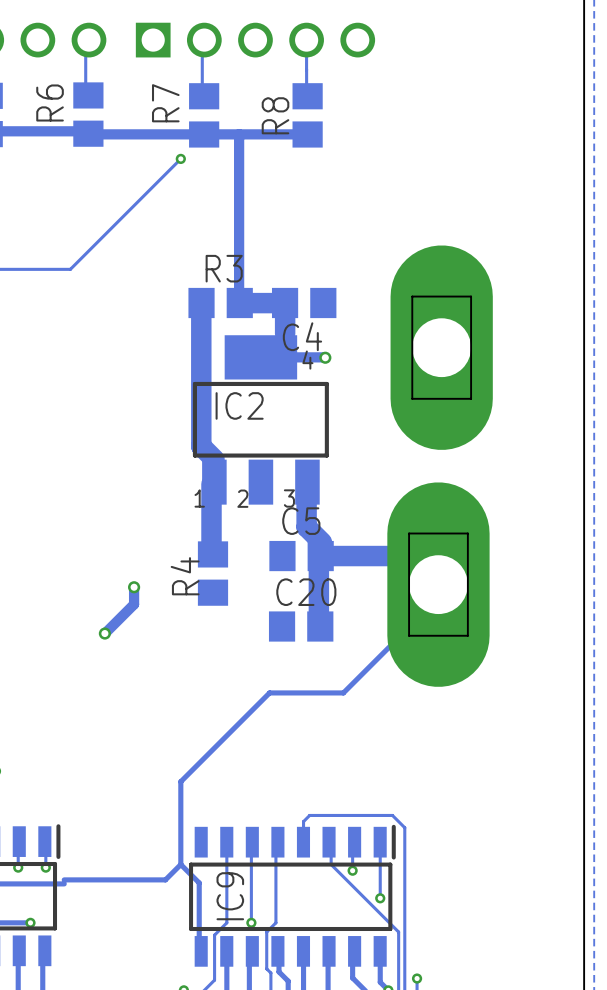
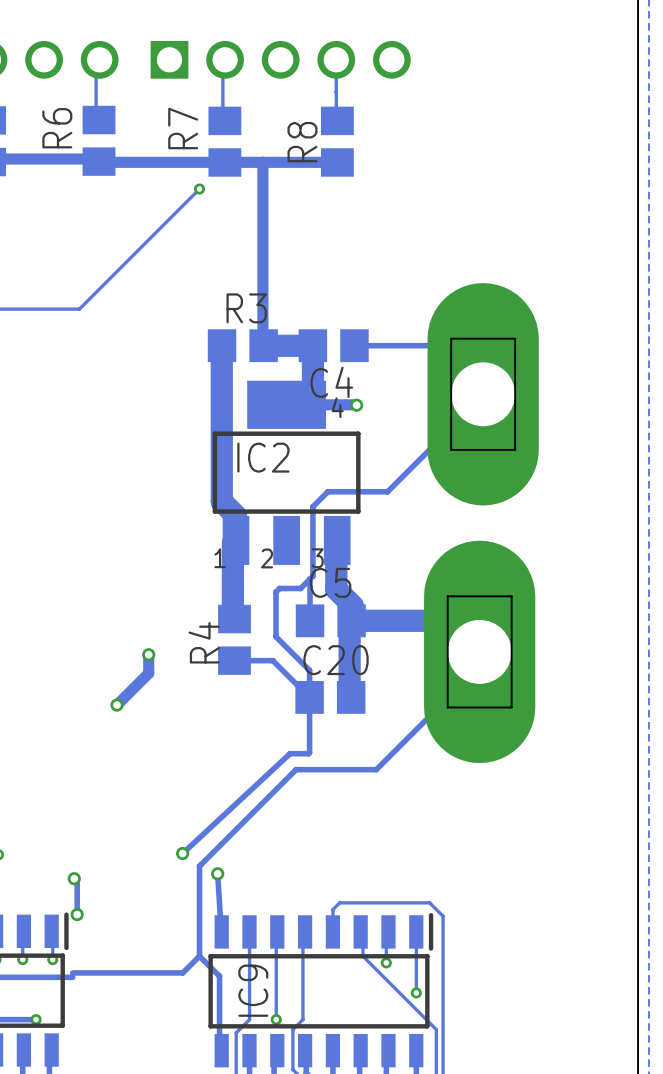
track: none -> (354, 345) (434, 345) (483, 394) (387, 491) (327, 491) (312, 506) (312, 576) (300, 588) (279, 588) (276, 592) (276, 636) (309, 670) (309, 752) (290, 753) (182, 853)
track: none -> (310, 579) (310, 620)
track: none -> (234, 660) (272, 660) (309, 697)
via: none -> (182, 853)
track: none -> (217, 873) (221, 931)
via: none -> (217, 873)
track: none -> (74, 878) (77, 881) (77, 914)
via: none -> (74, 878)
via: none -> (77, 914)

